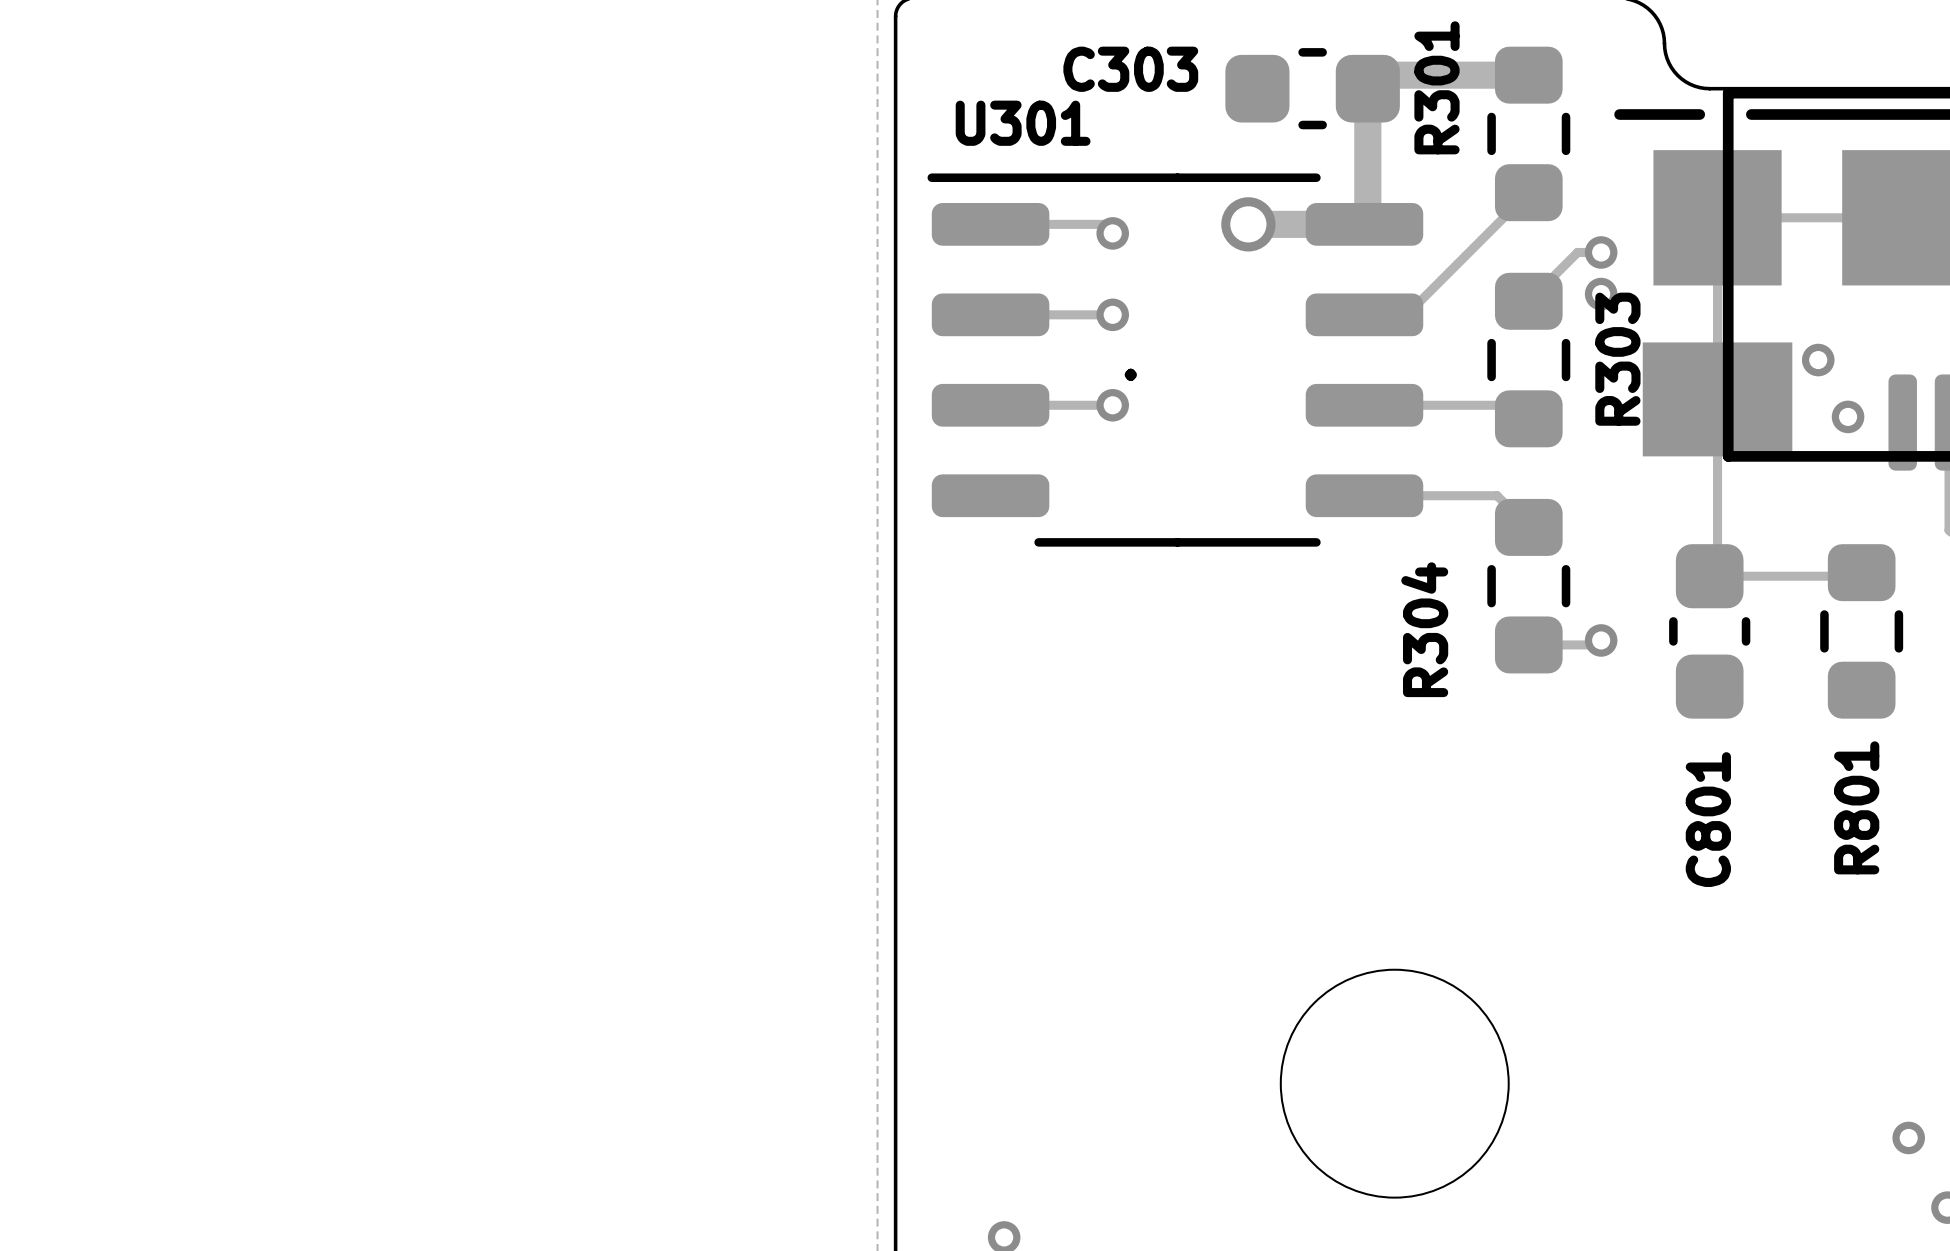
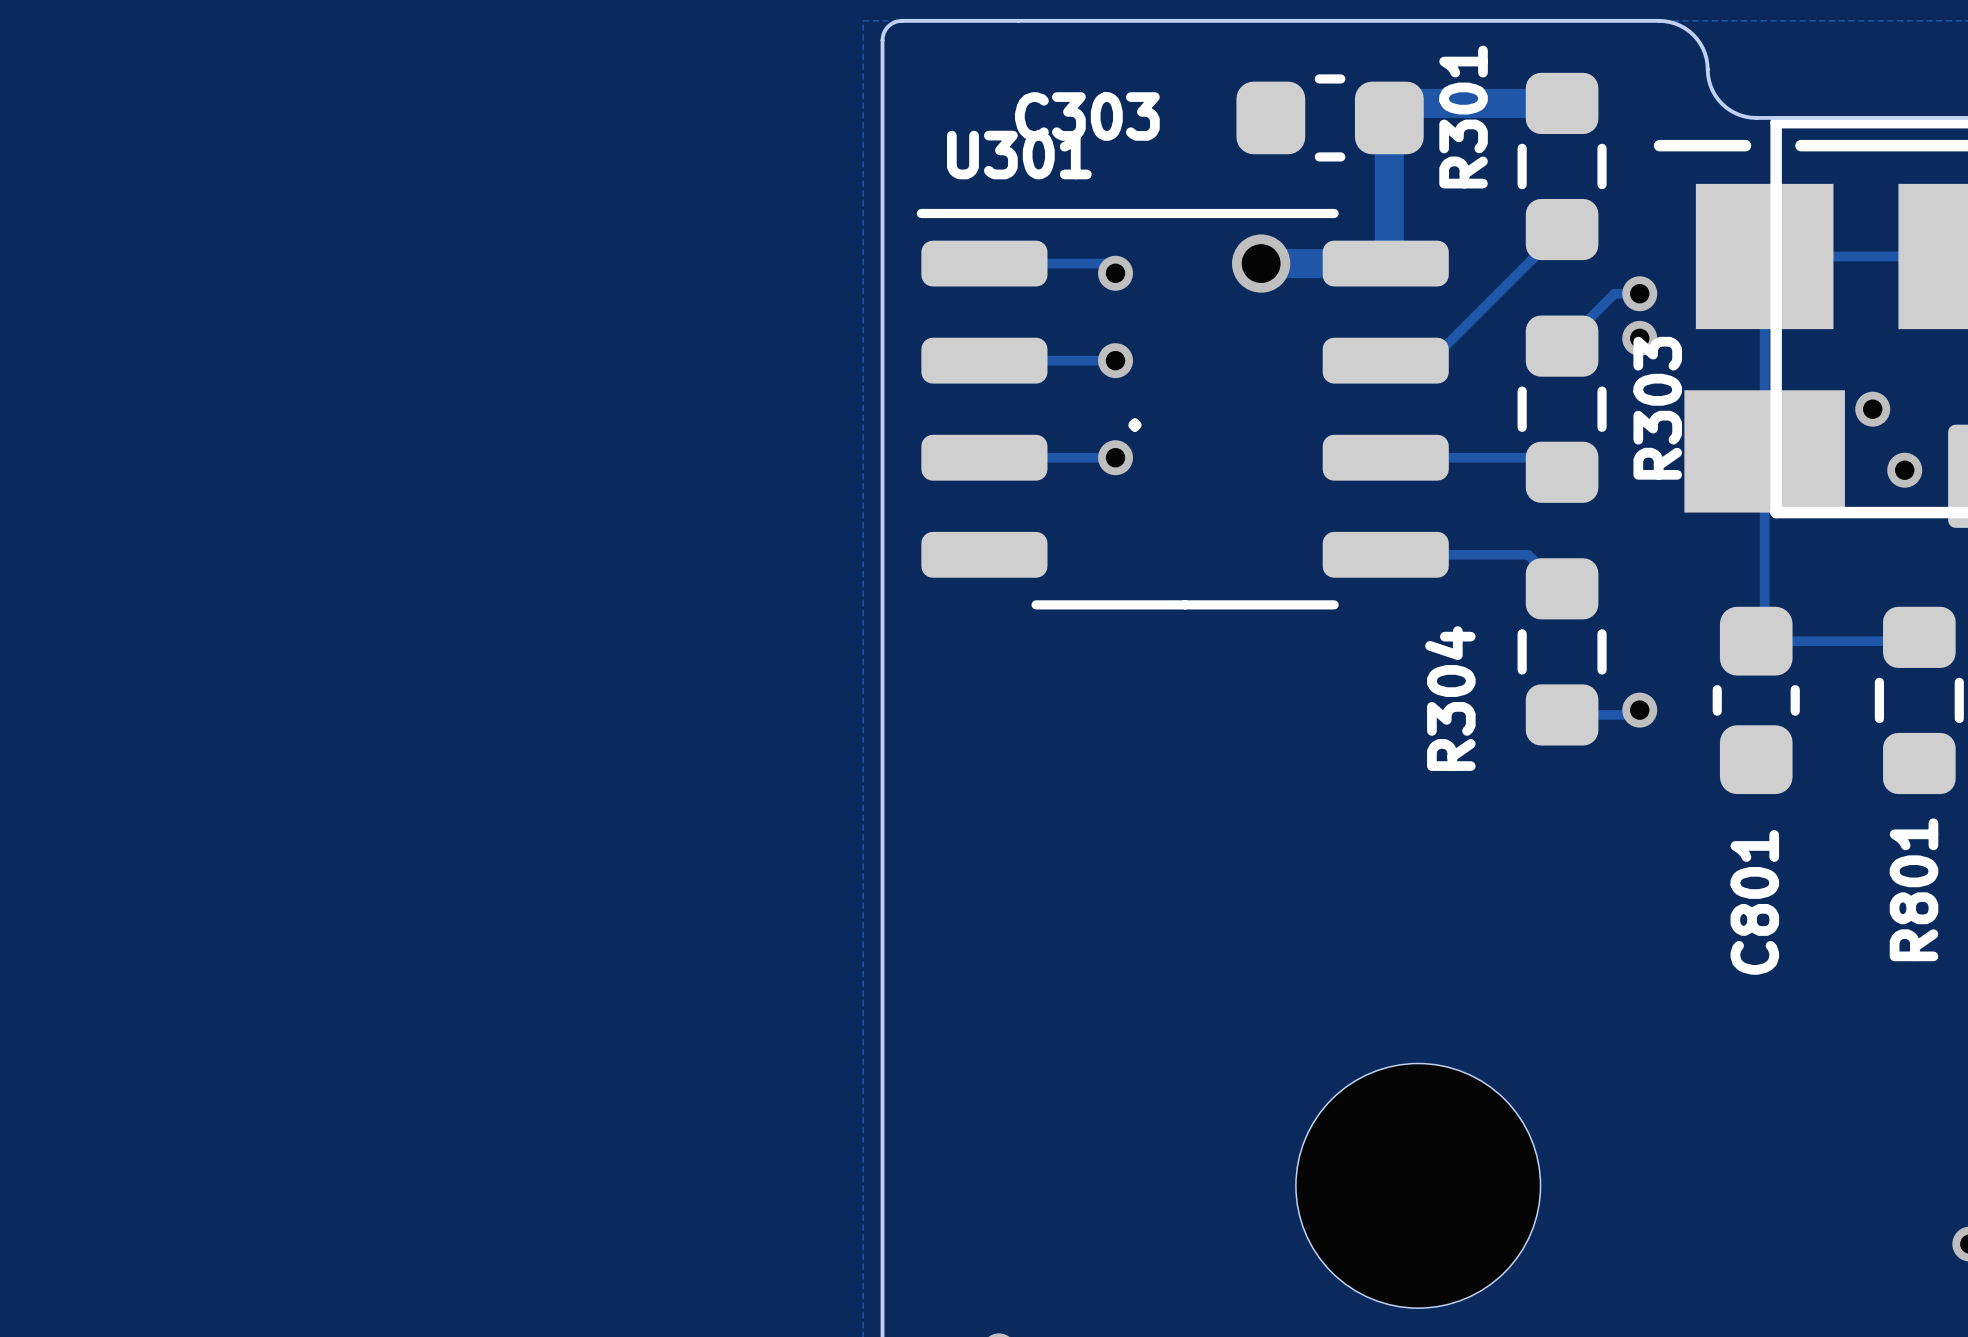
C303 name position: C303 (1130, 69) -> C303 (1087, 116)

